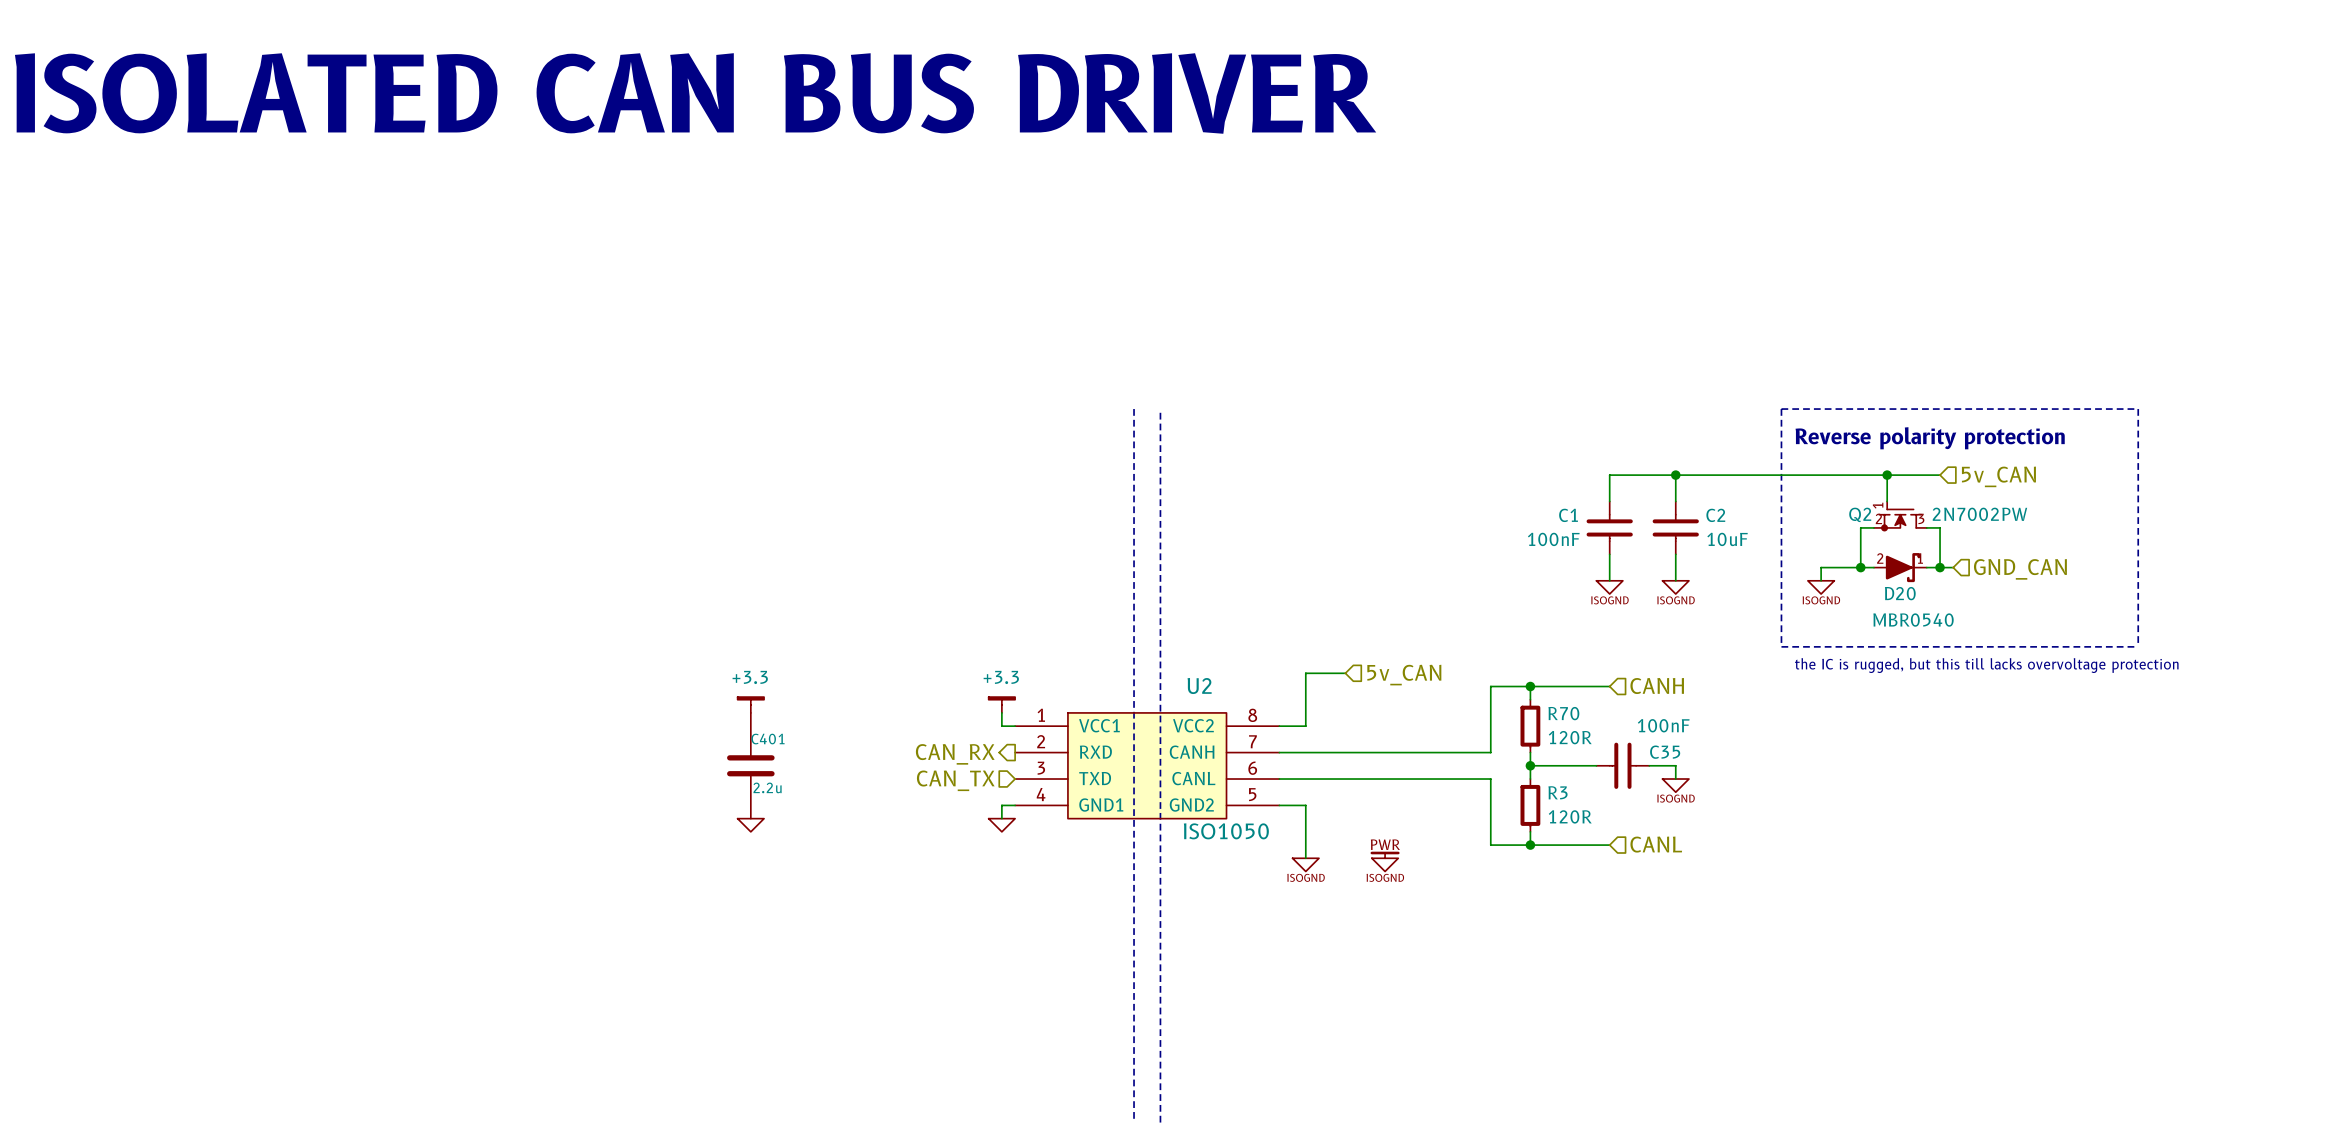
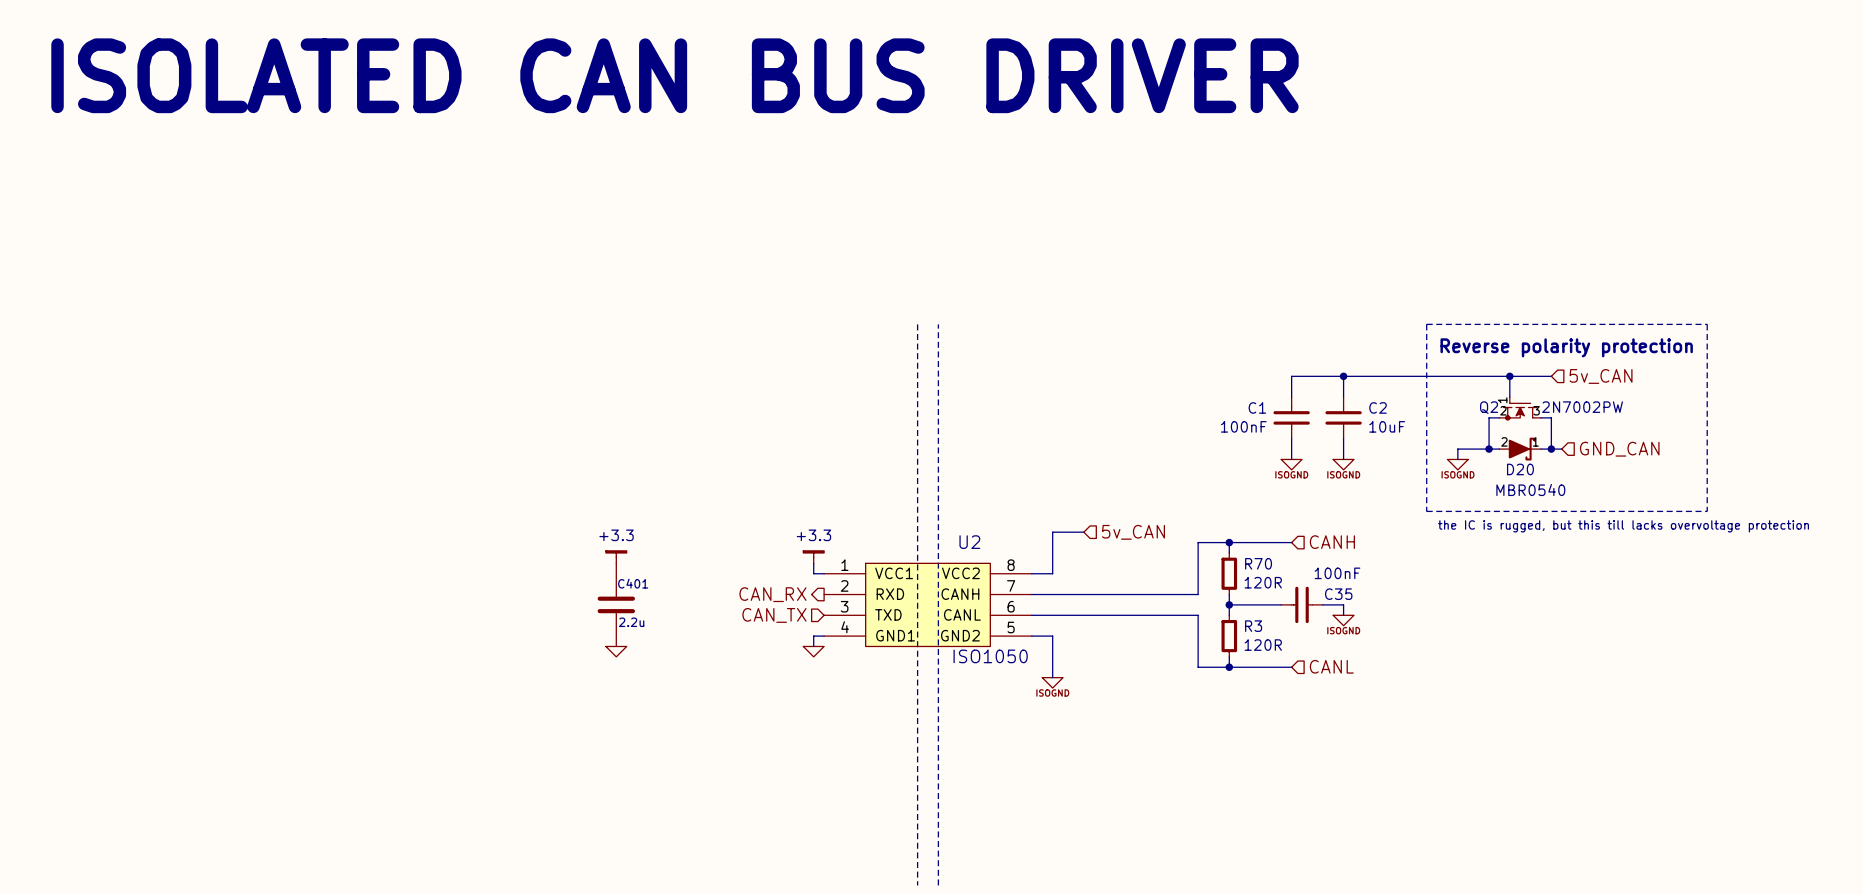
power symbol: (1385, 854) -> none
power symbol: (1385, 864) -> none

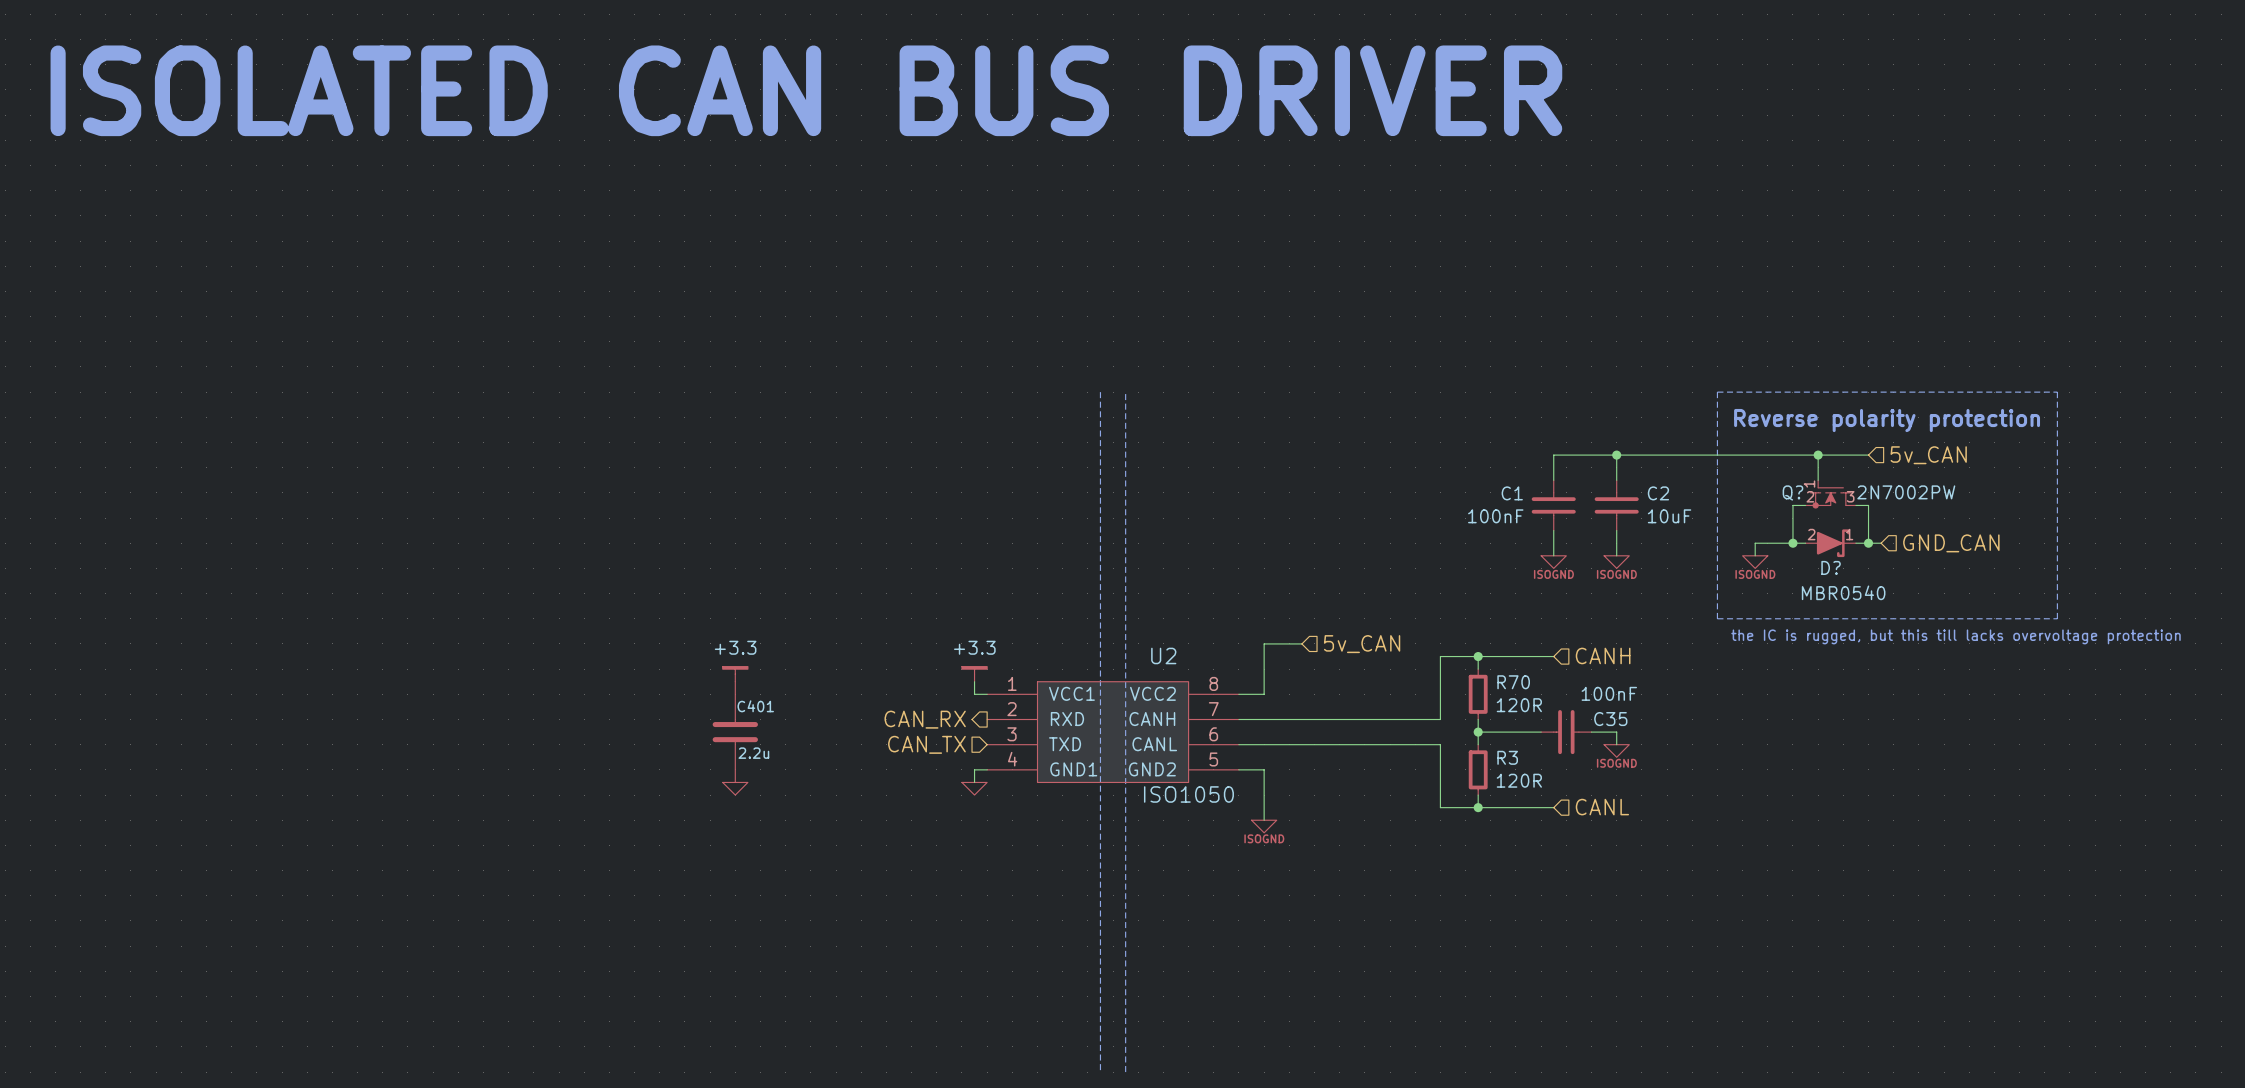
Q2 name: Q2 (1489, 407) -> Q? (1792, 492)
D20 name: D20 (1520, 469) -> D? (1831, 567)

